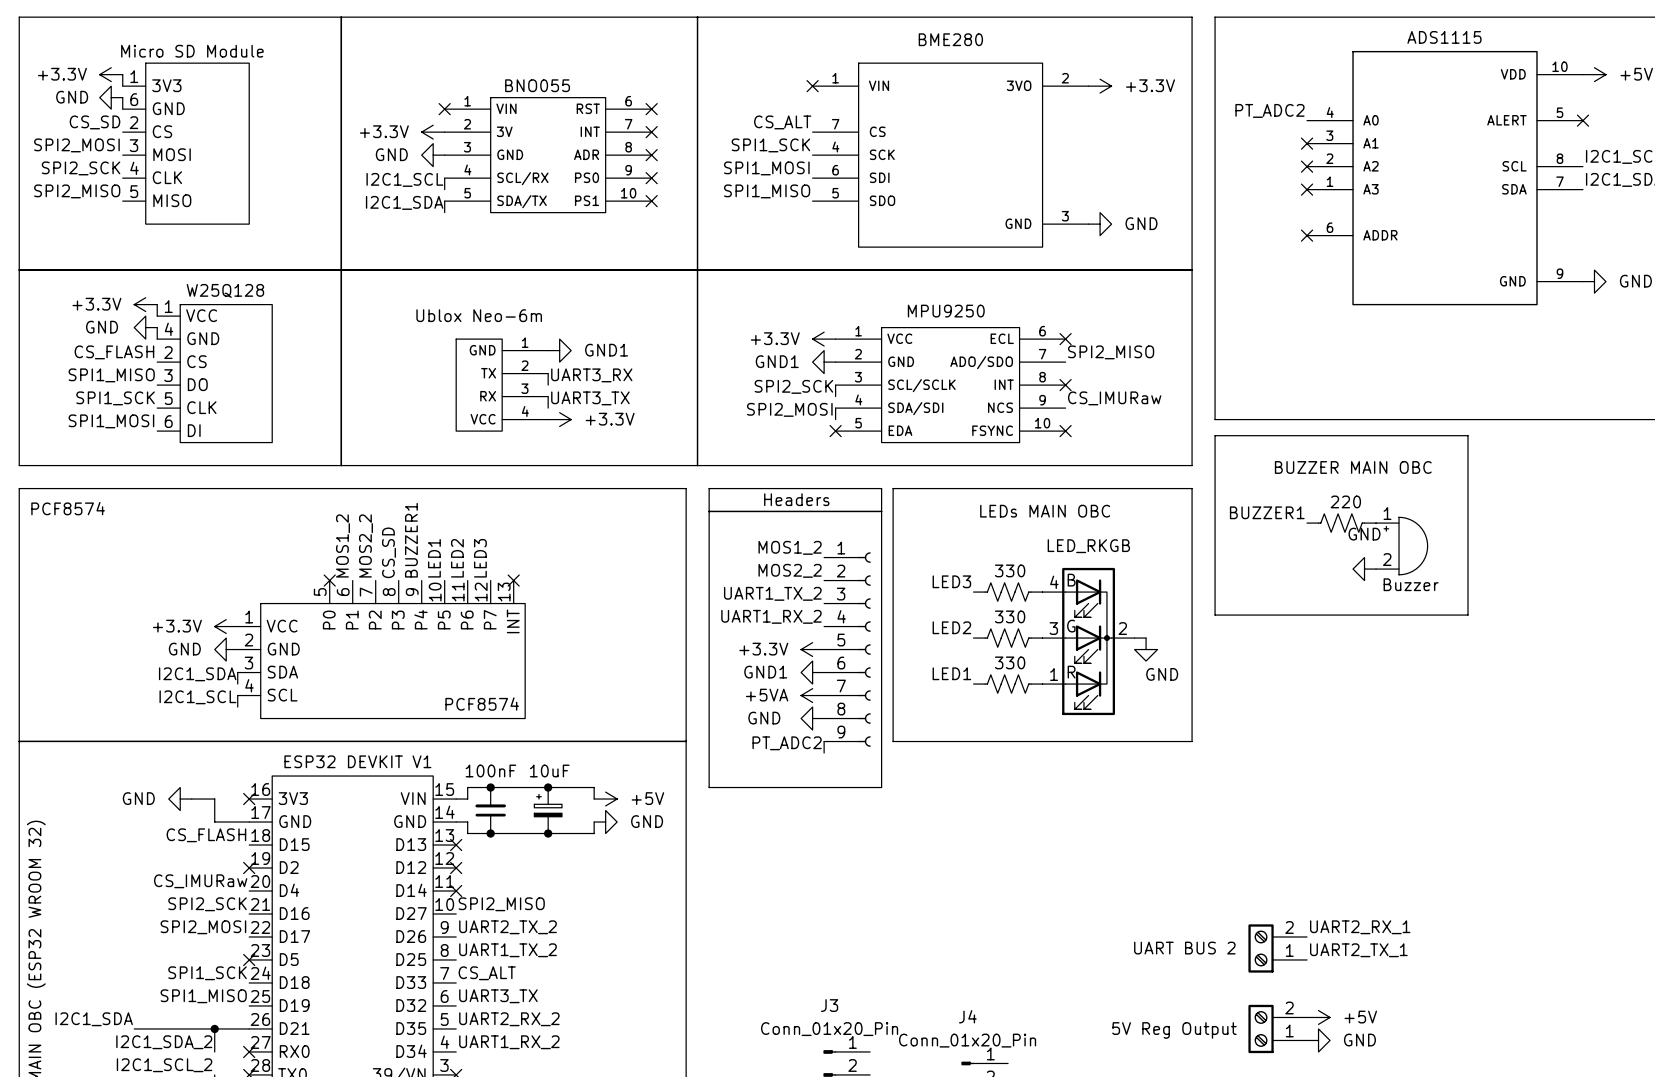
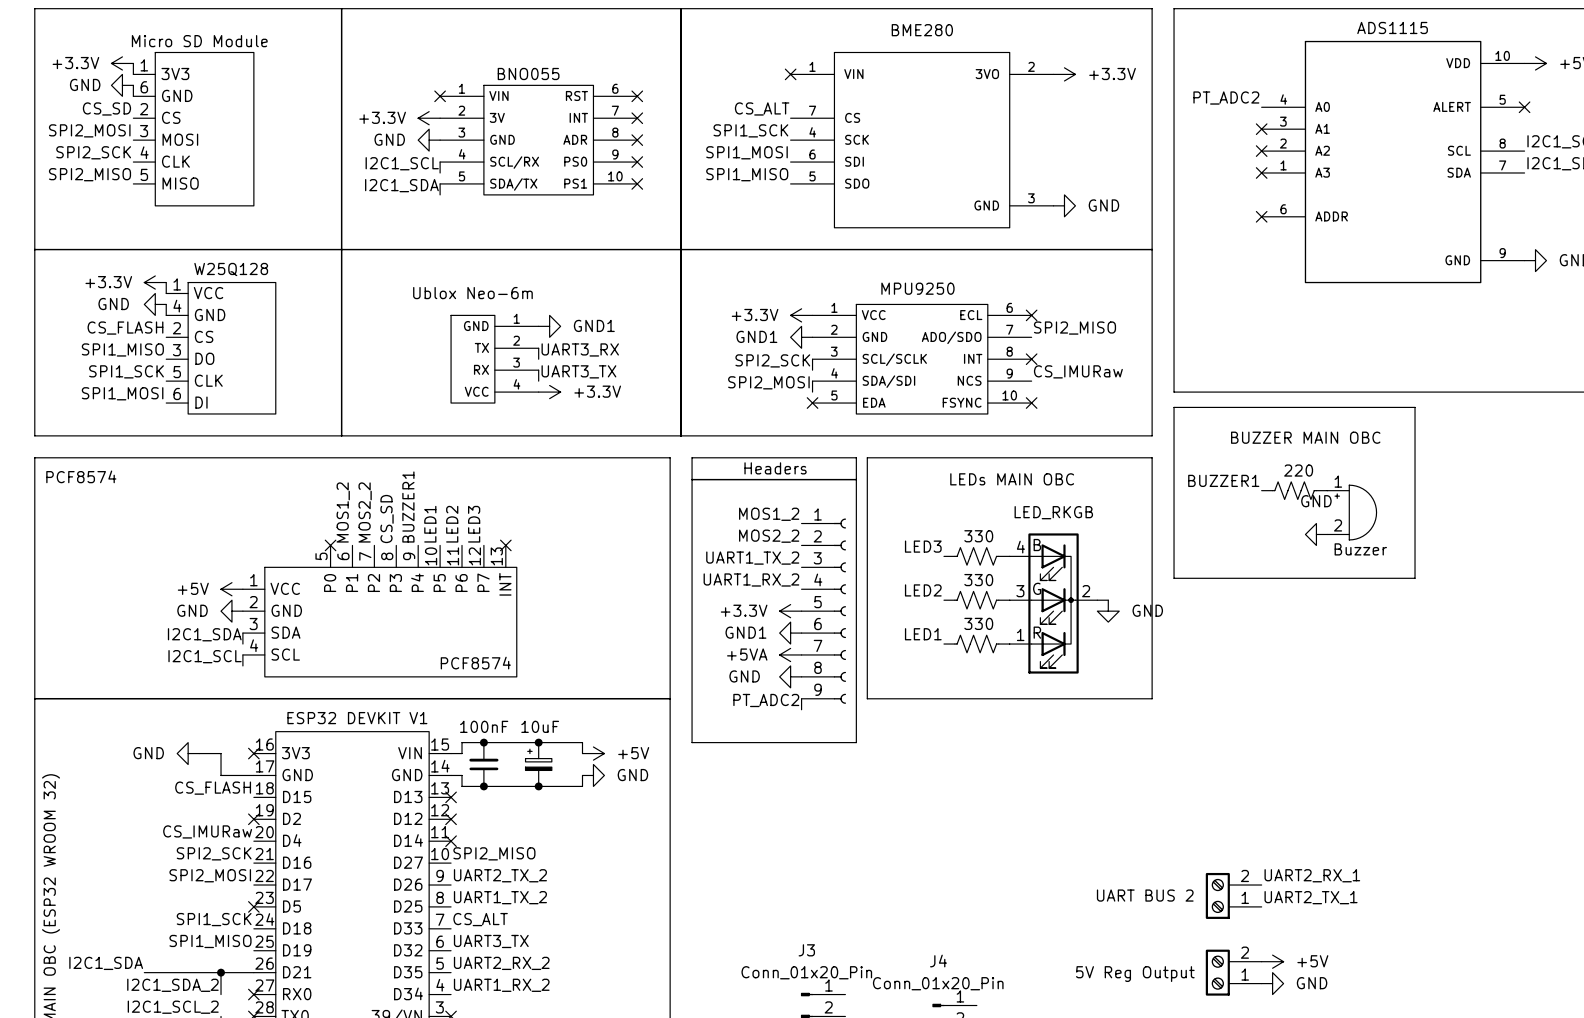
power symbol: +3.3V (226, 626) -> +5V (231, 589)
power symbol text position: GND (1162, 674) -> GND (1147, 610)

